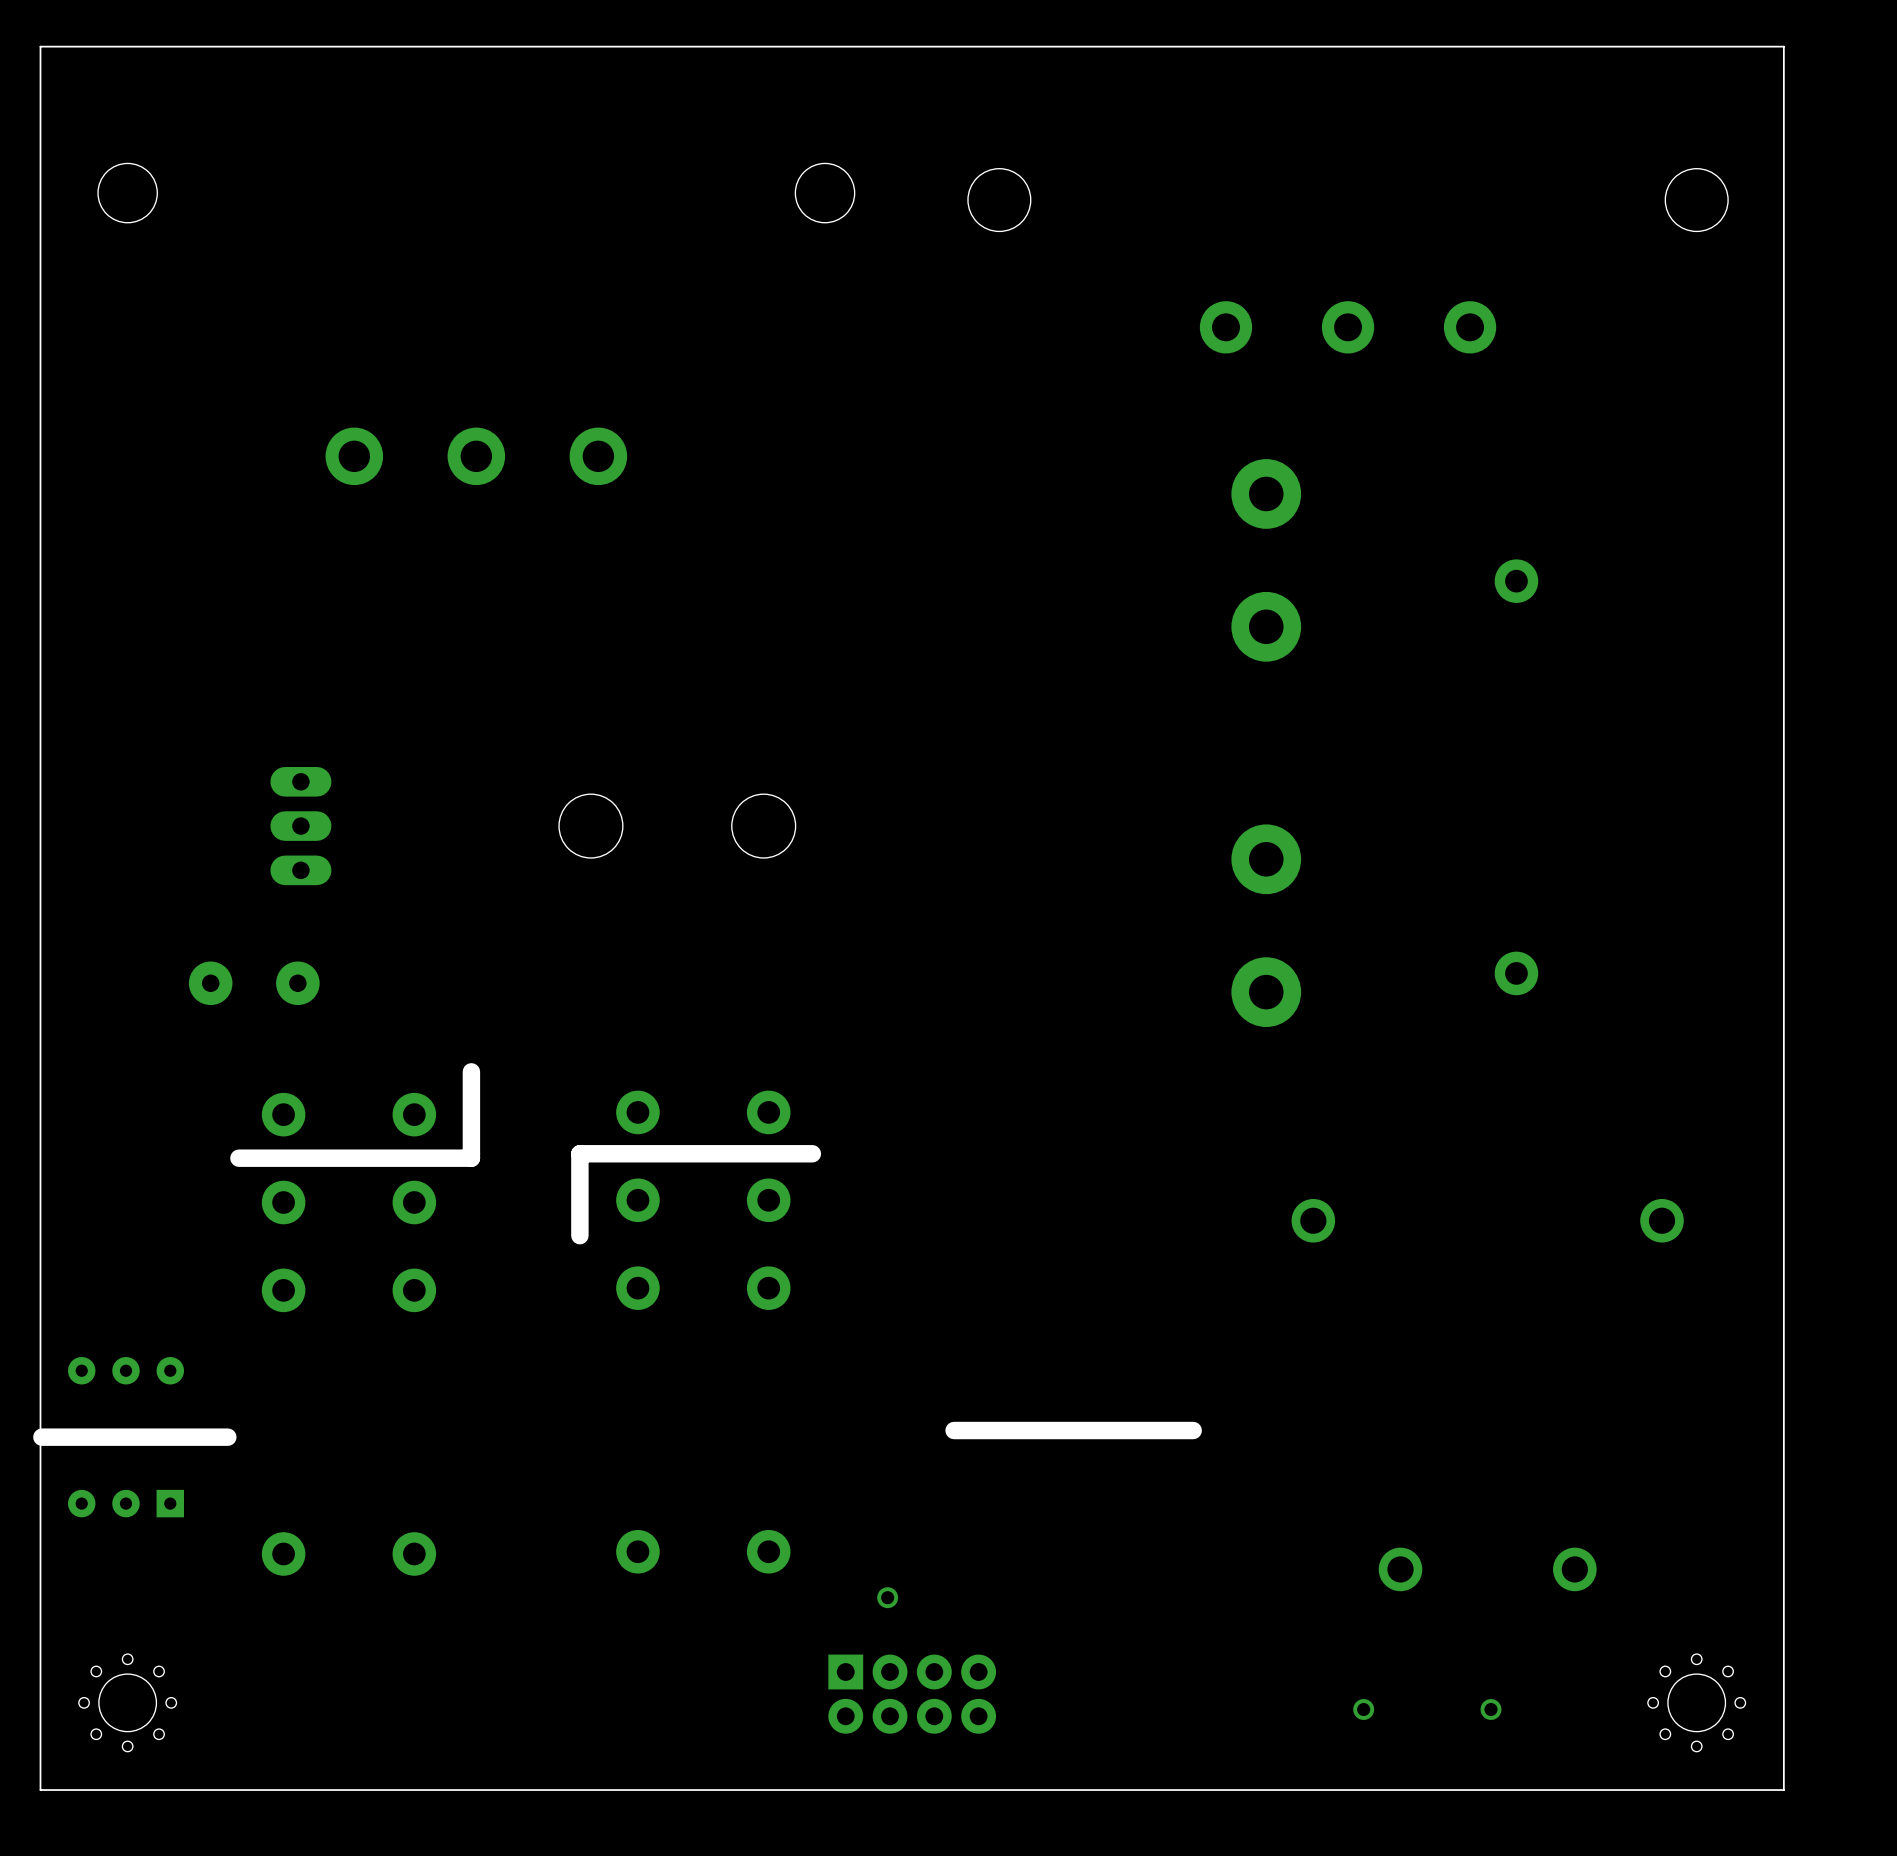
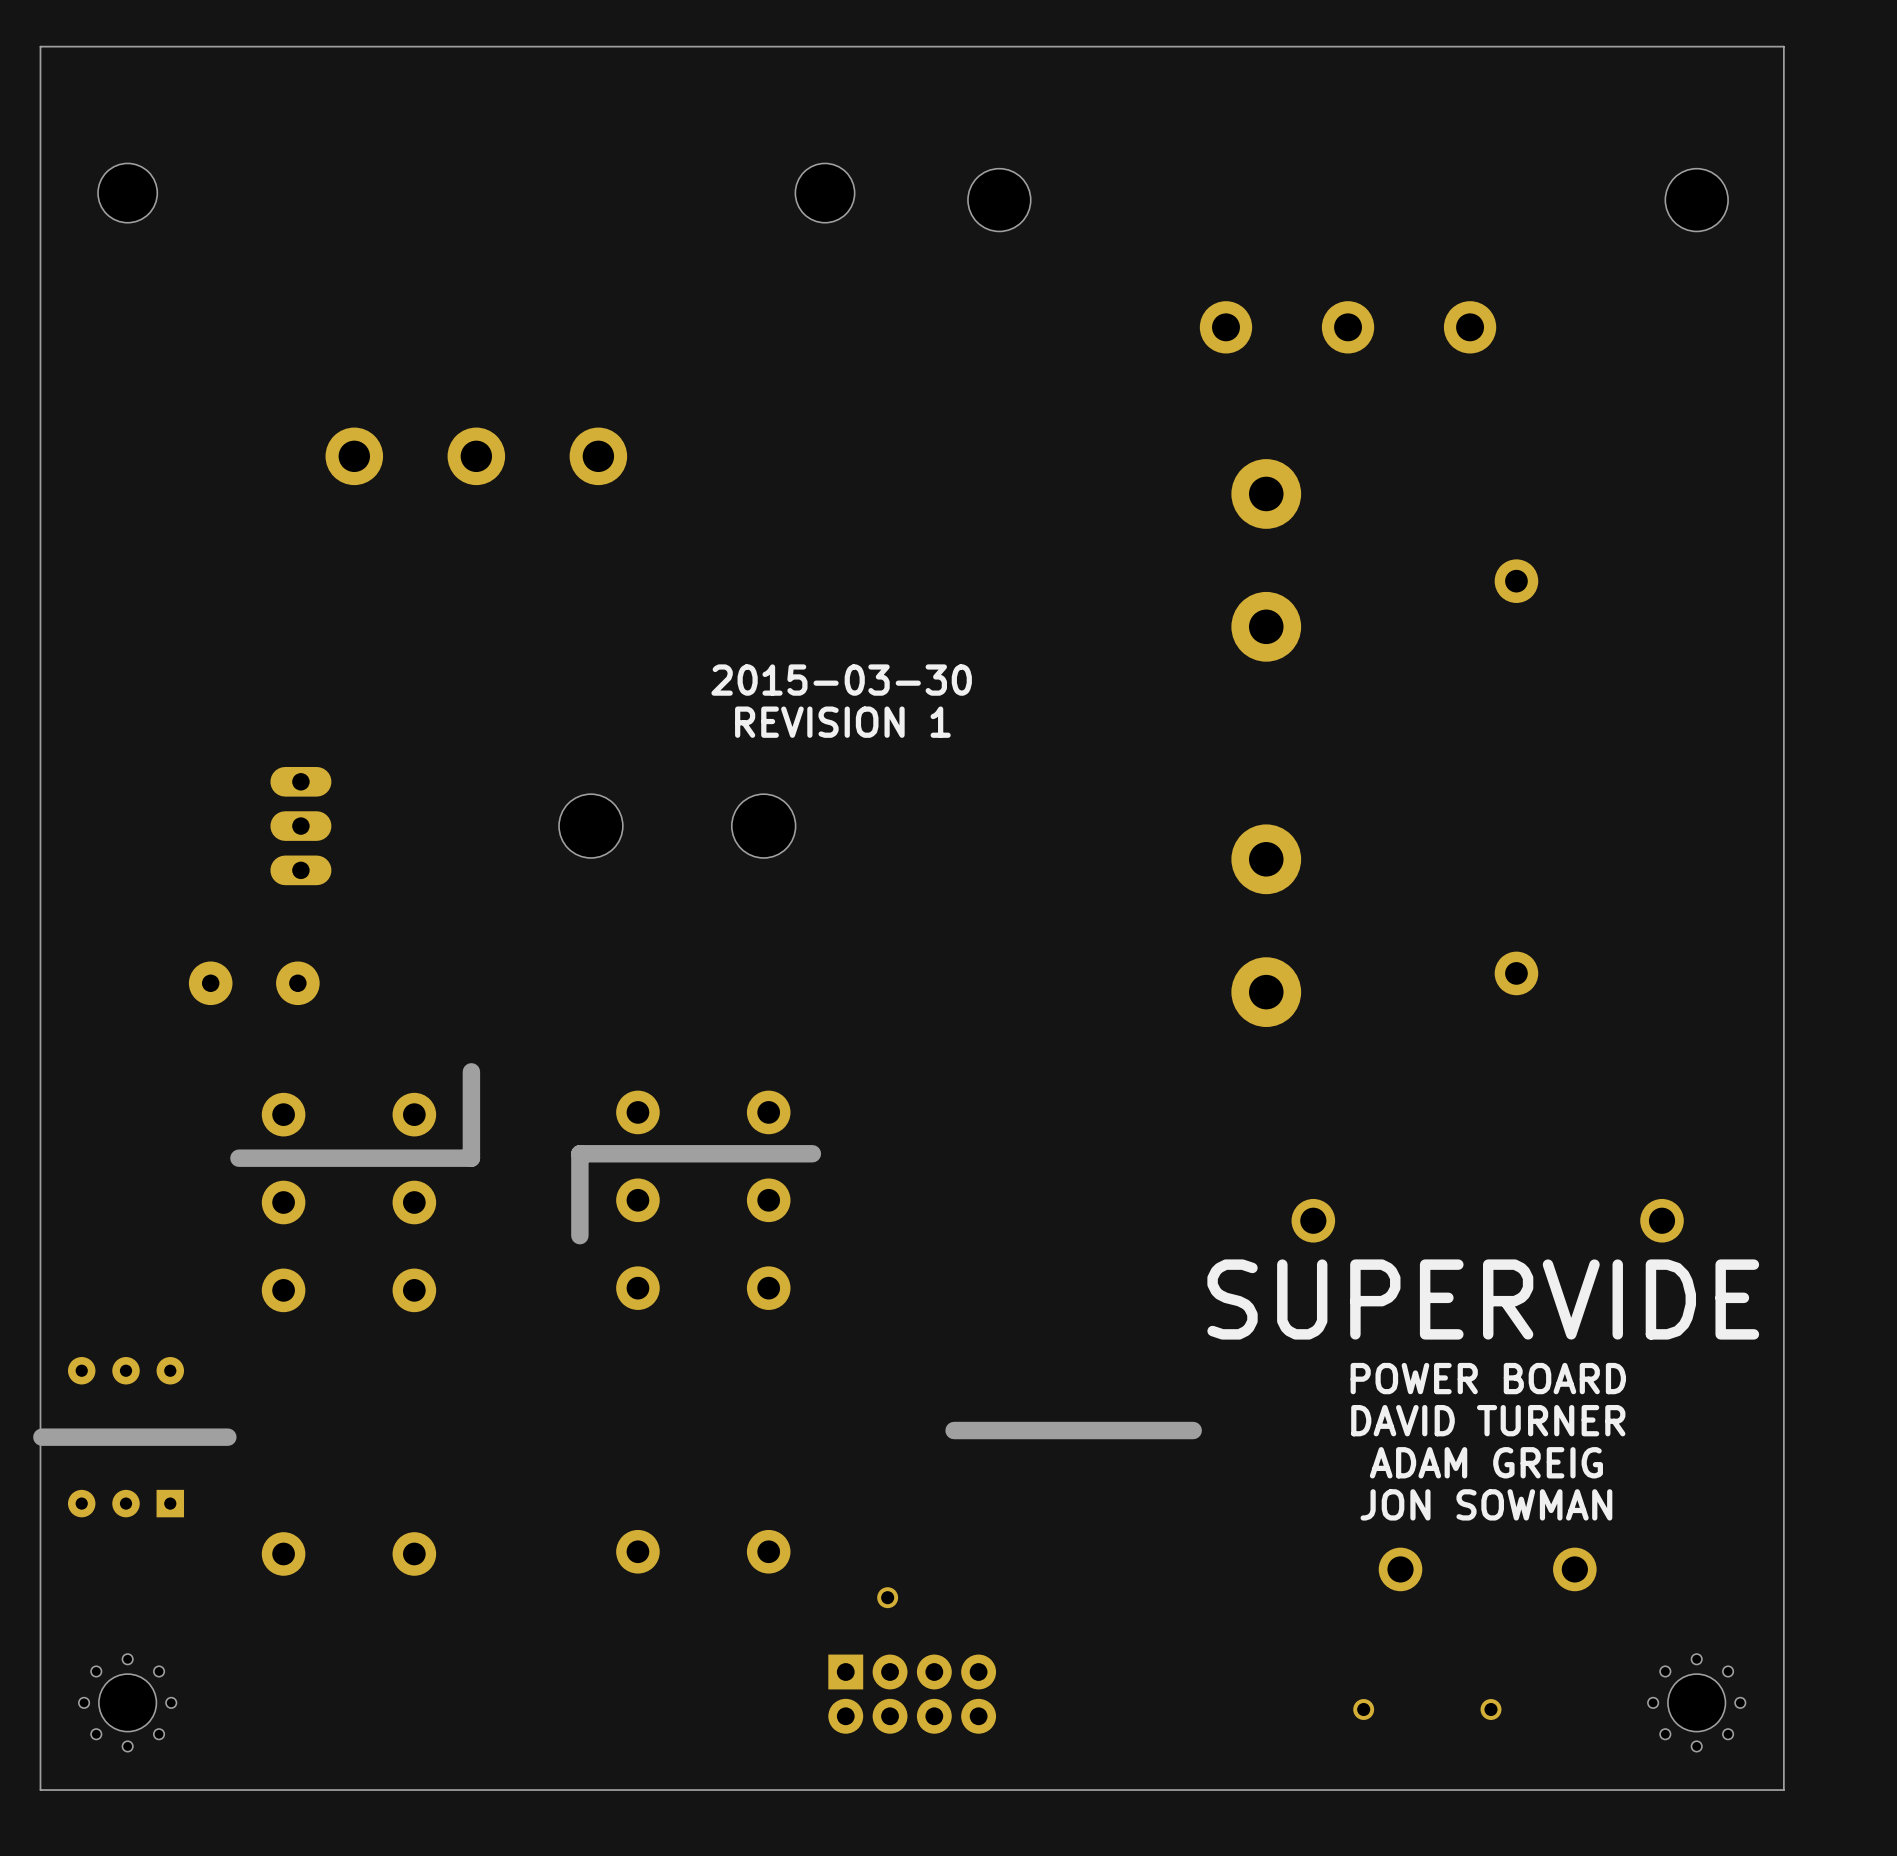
text: none -> 2015-03-30 (841, 680)
text: none -> REVISION 1 (842, 722)
text: none -> SUPERVIDE (1483, 1299)
text: none -> POWER BOARD (1488, 1378)
text: none -> DAVID TURNER (1488, 1420)
text: none -> ADAM GREIG (1486, 1462)
text: none -> JON SOWMAN (1486, 1504)

